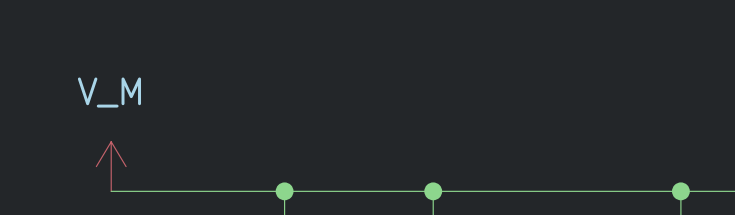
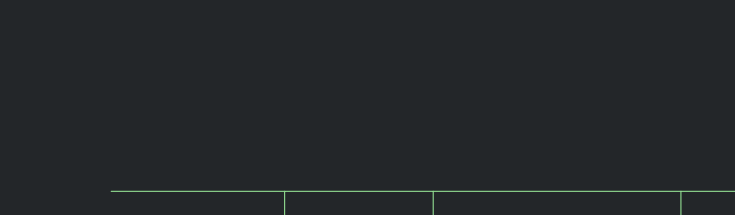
power symbol: V_M (111, 166) -> none
junction: (284, 191) -> none
junction: (433, 191) -> none
junction: (680, 191) -> none

